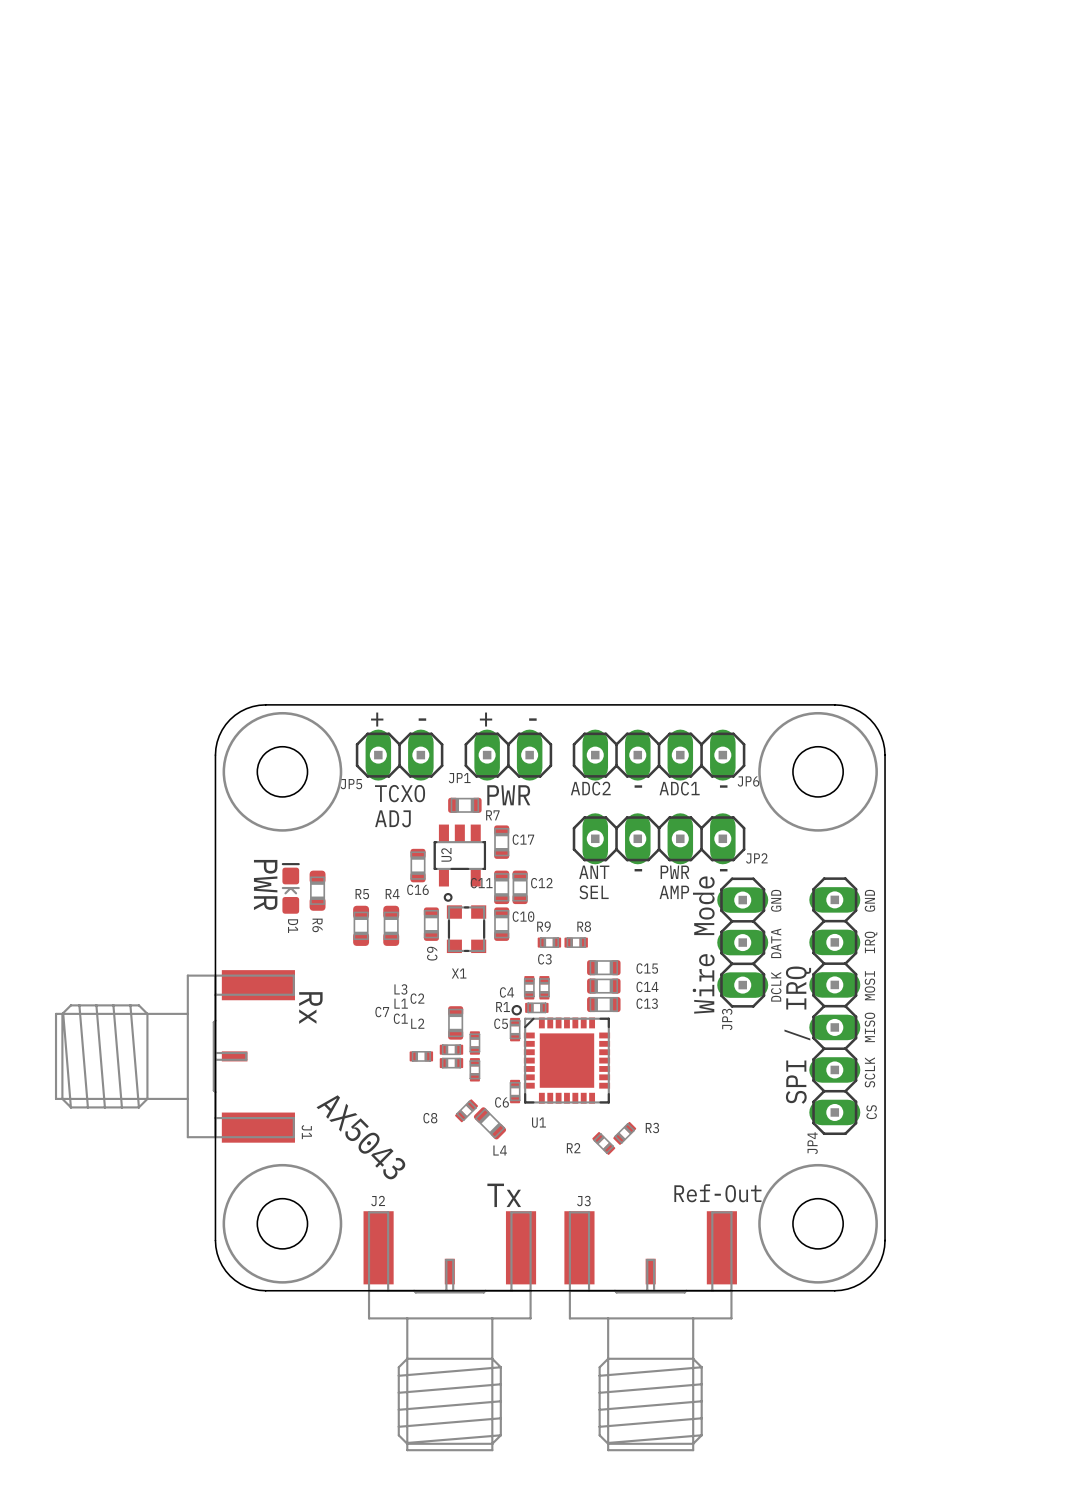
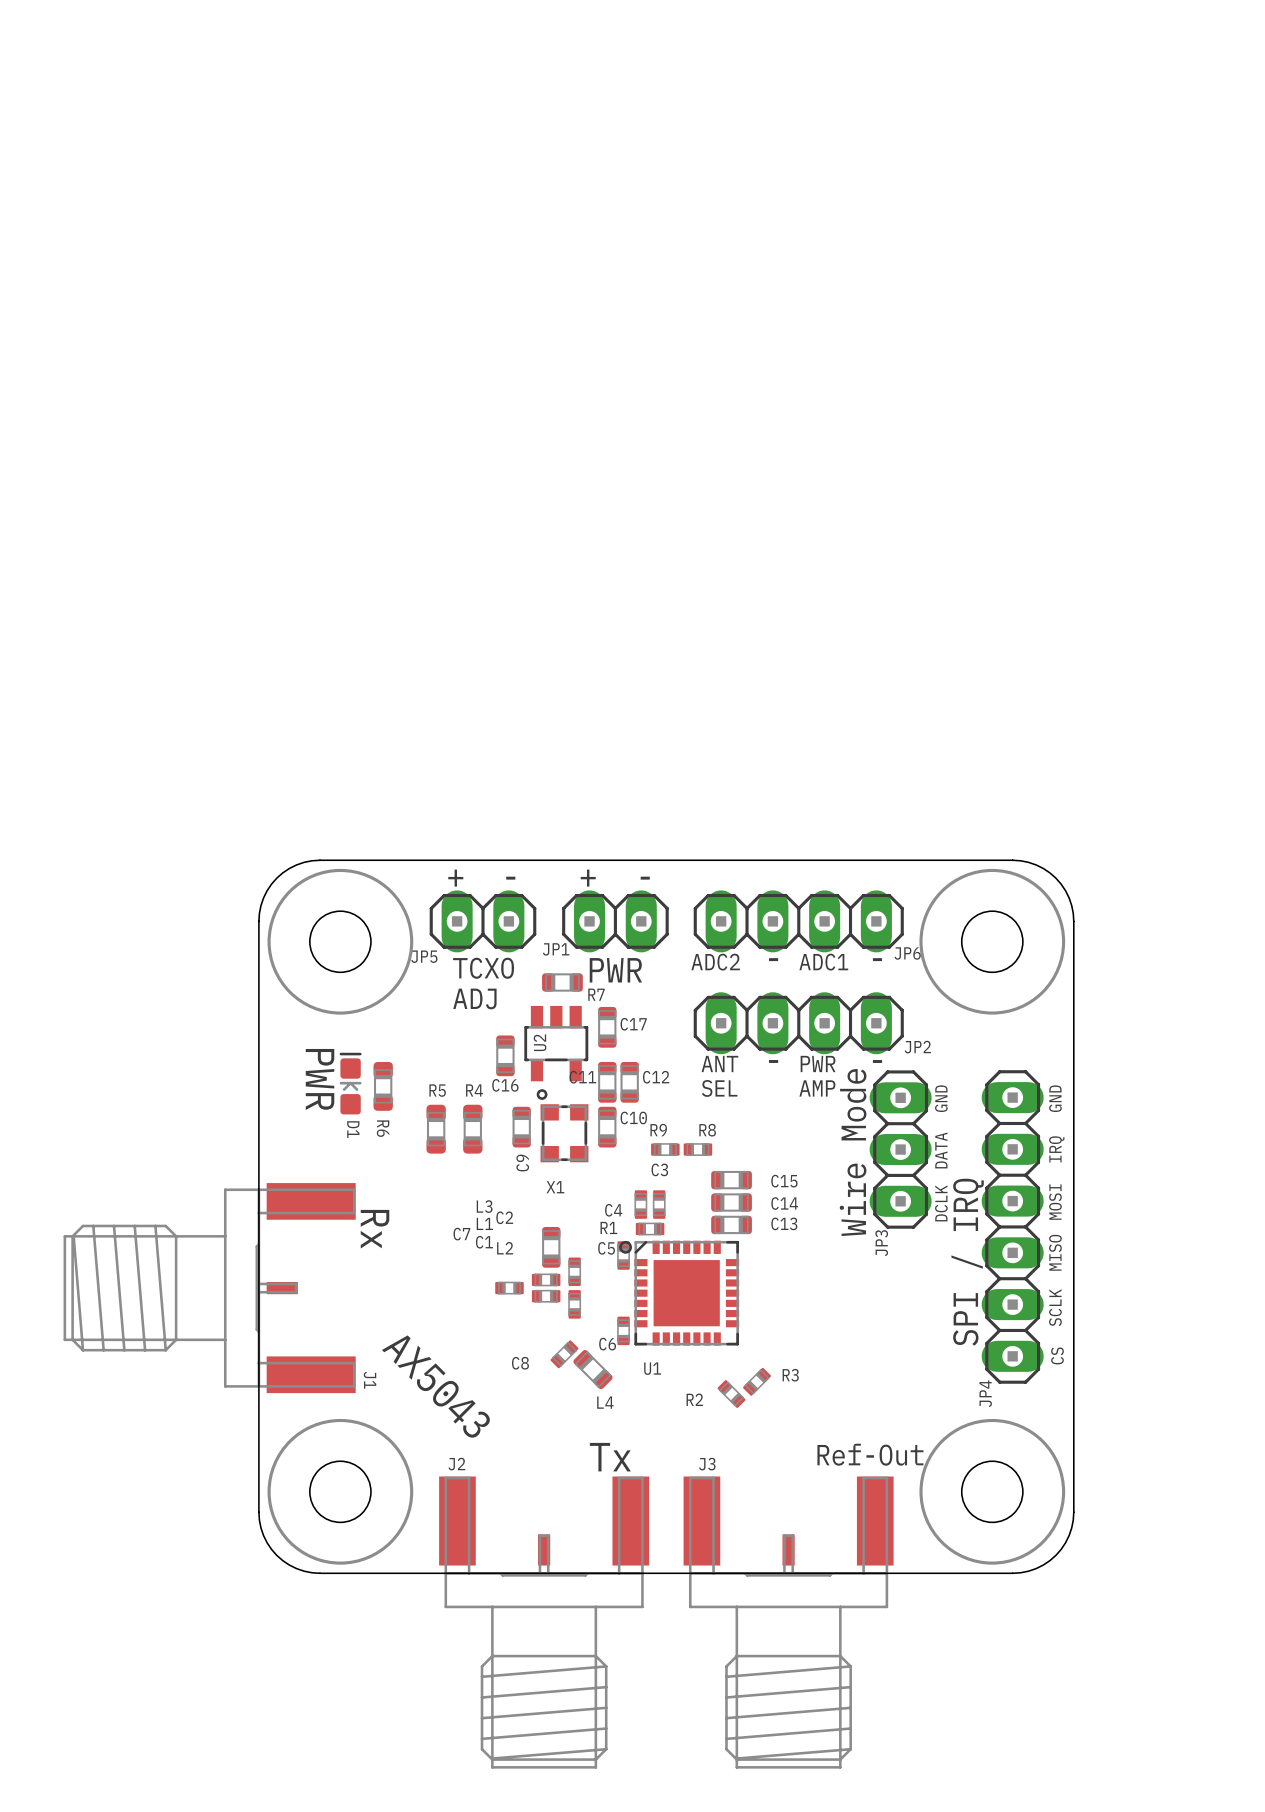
U1 footprint: [511, 1004, 611, 1104] -> [619, 1240, 740, 1346]

